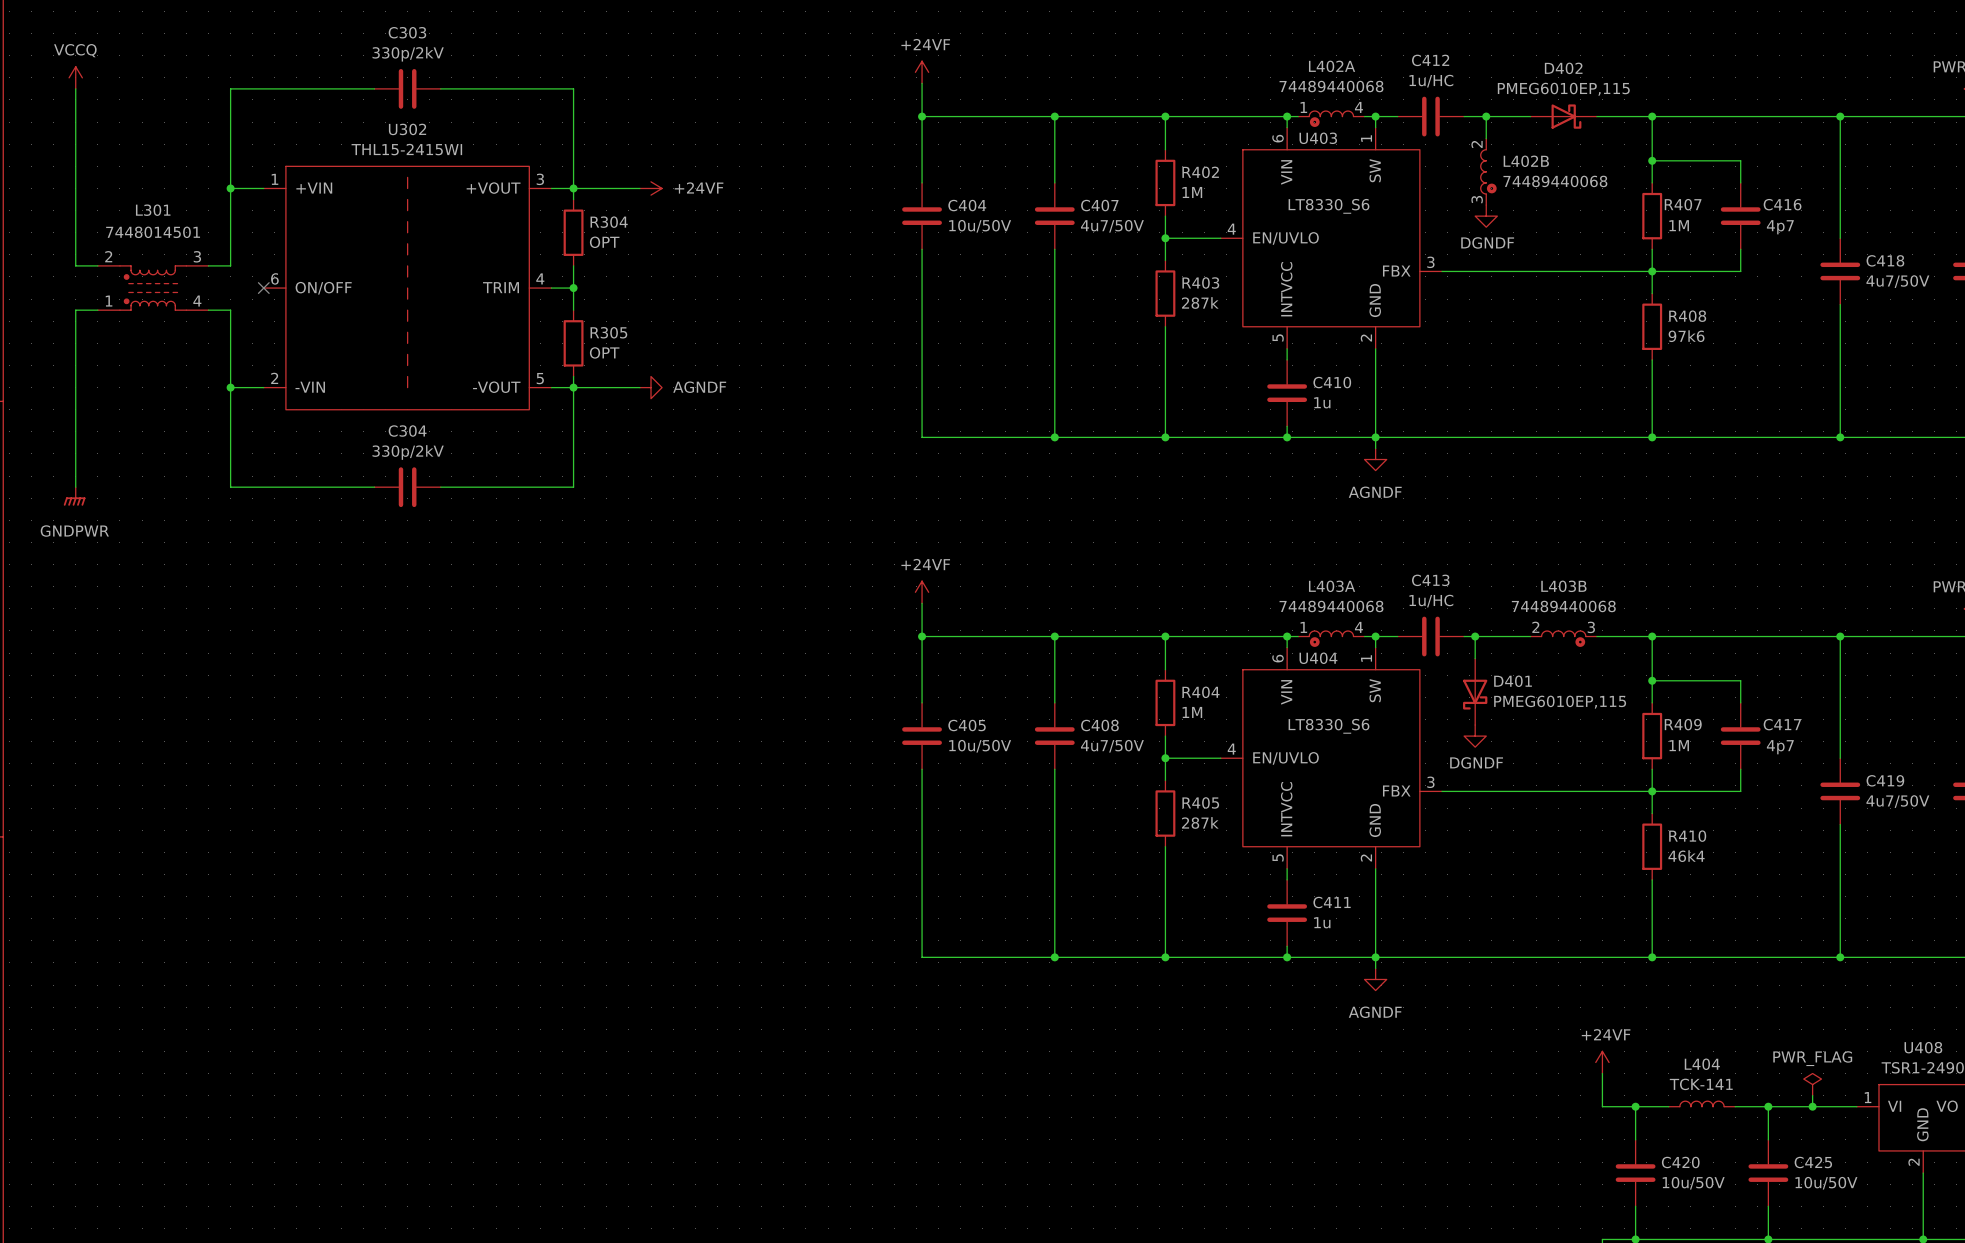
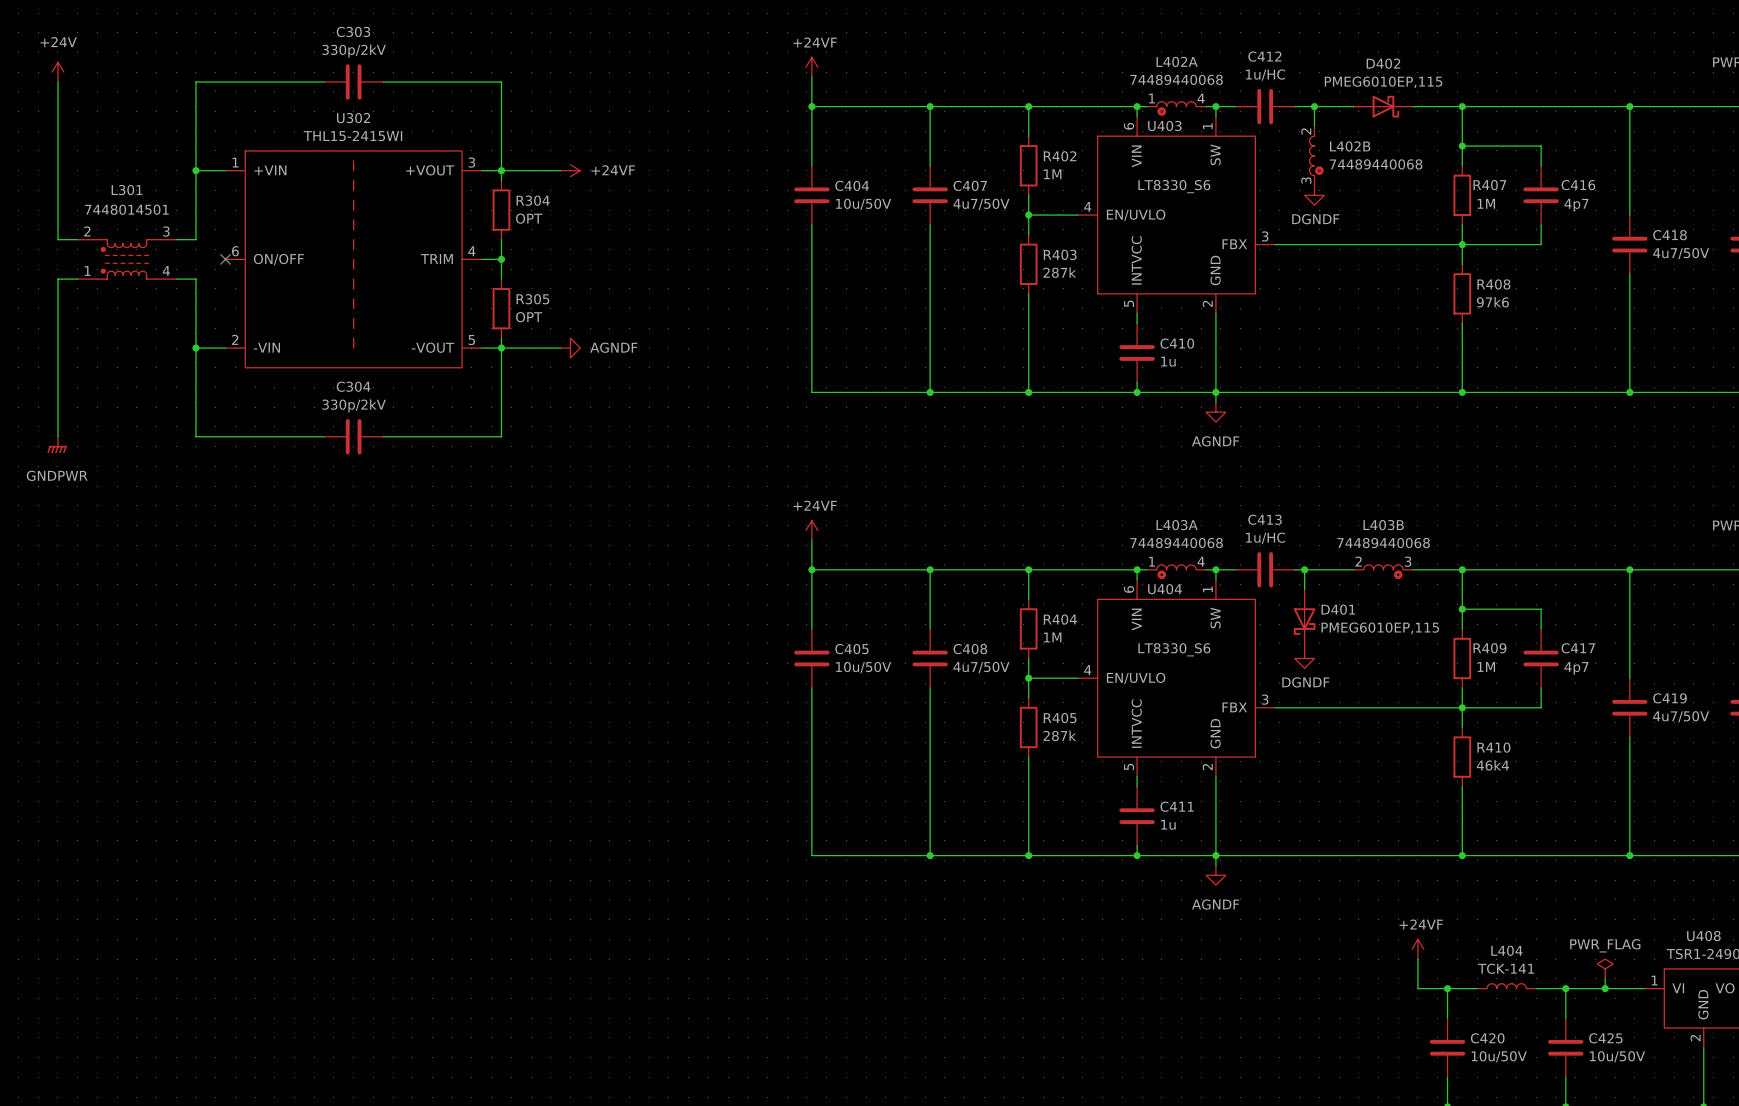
power symbol: VCCQ (75, 77) -> +24V (57, 72)

